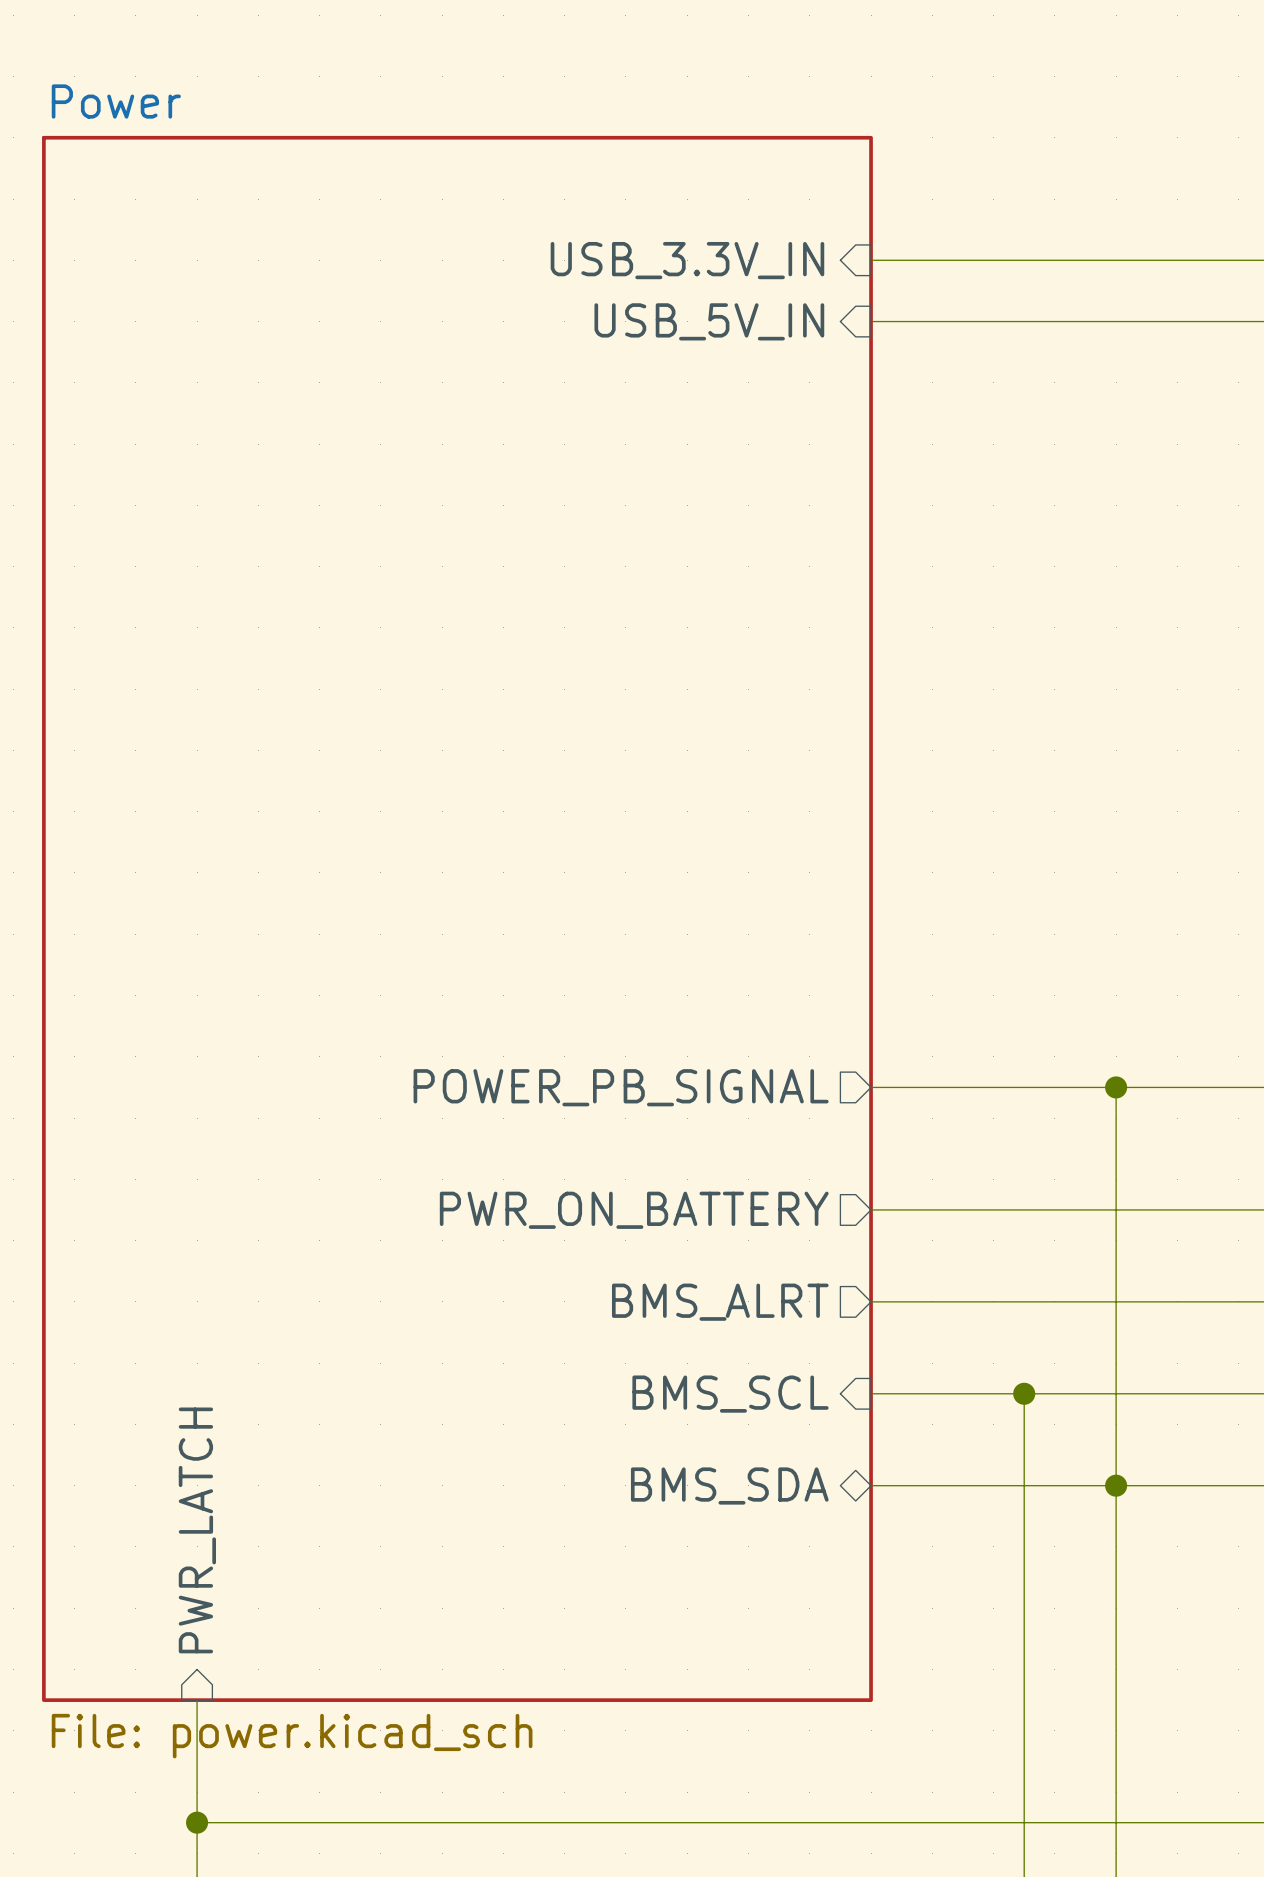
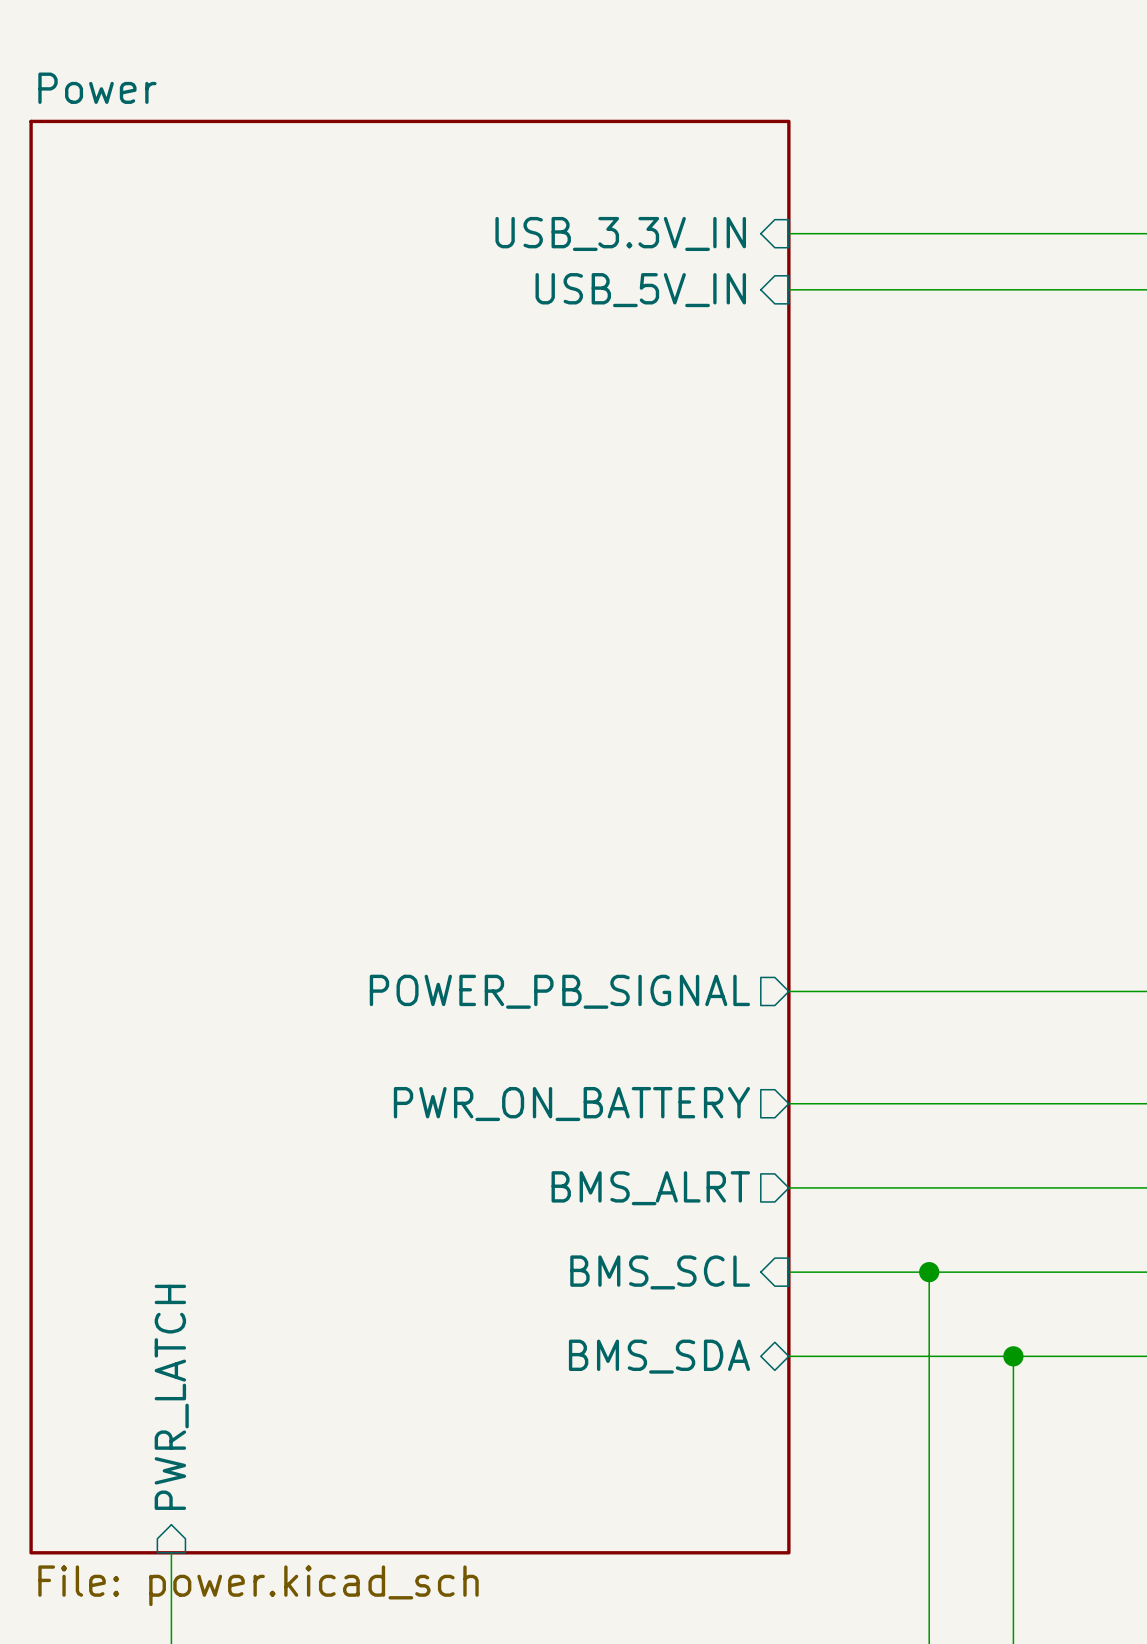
wire: (1116, 1087) (1116, 1485) -> none
junction: (1116, 1087) -> none

